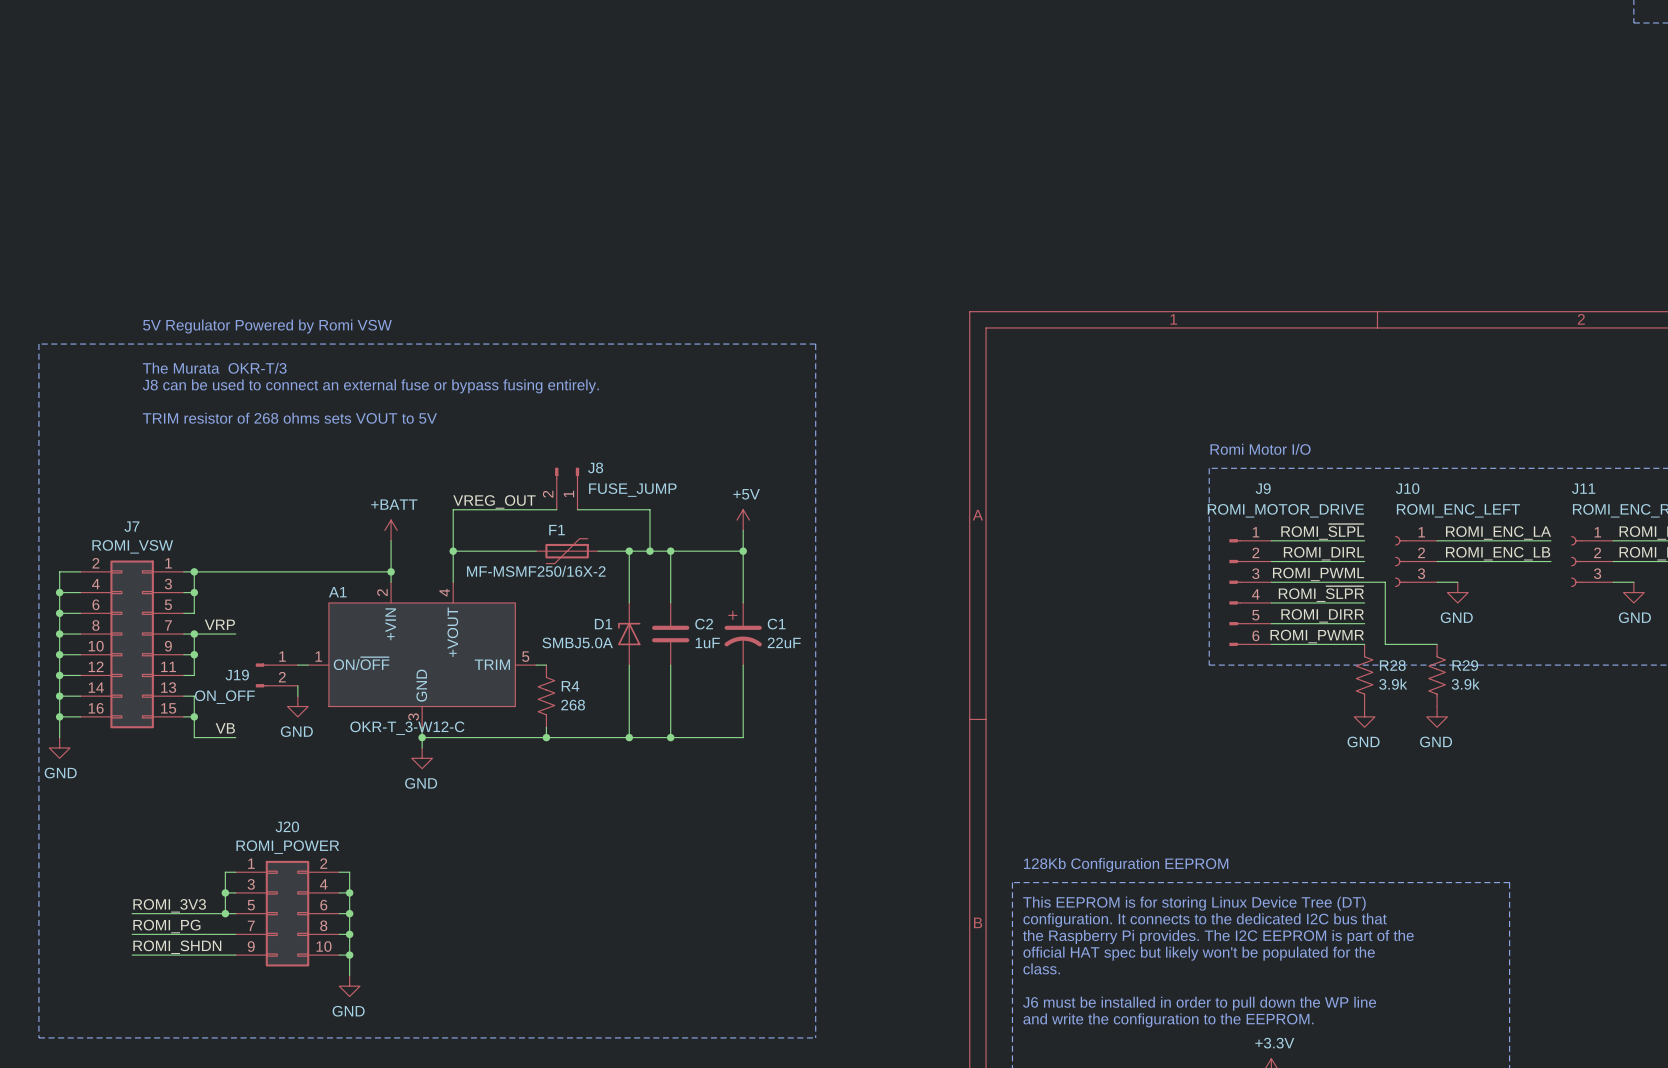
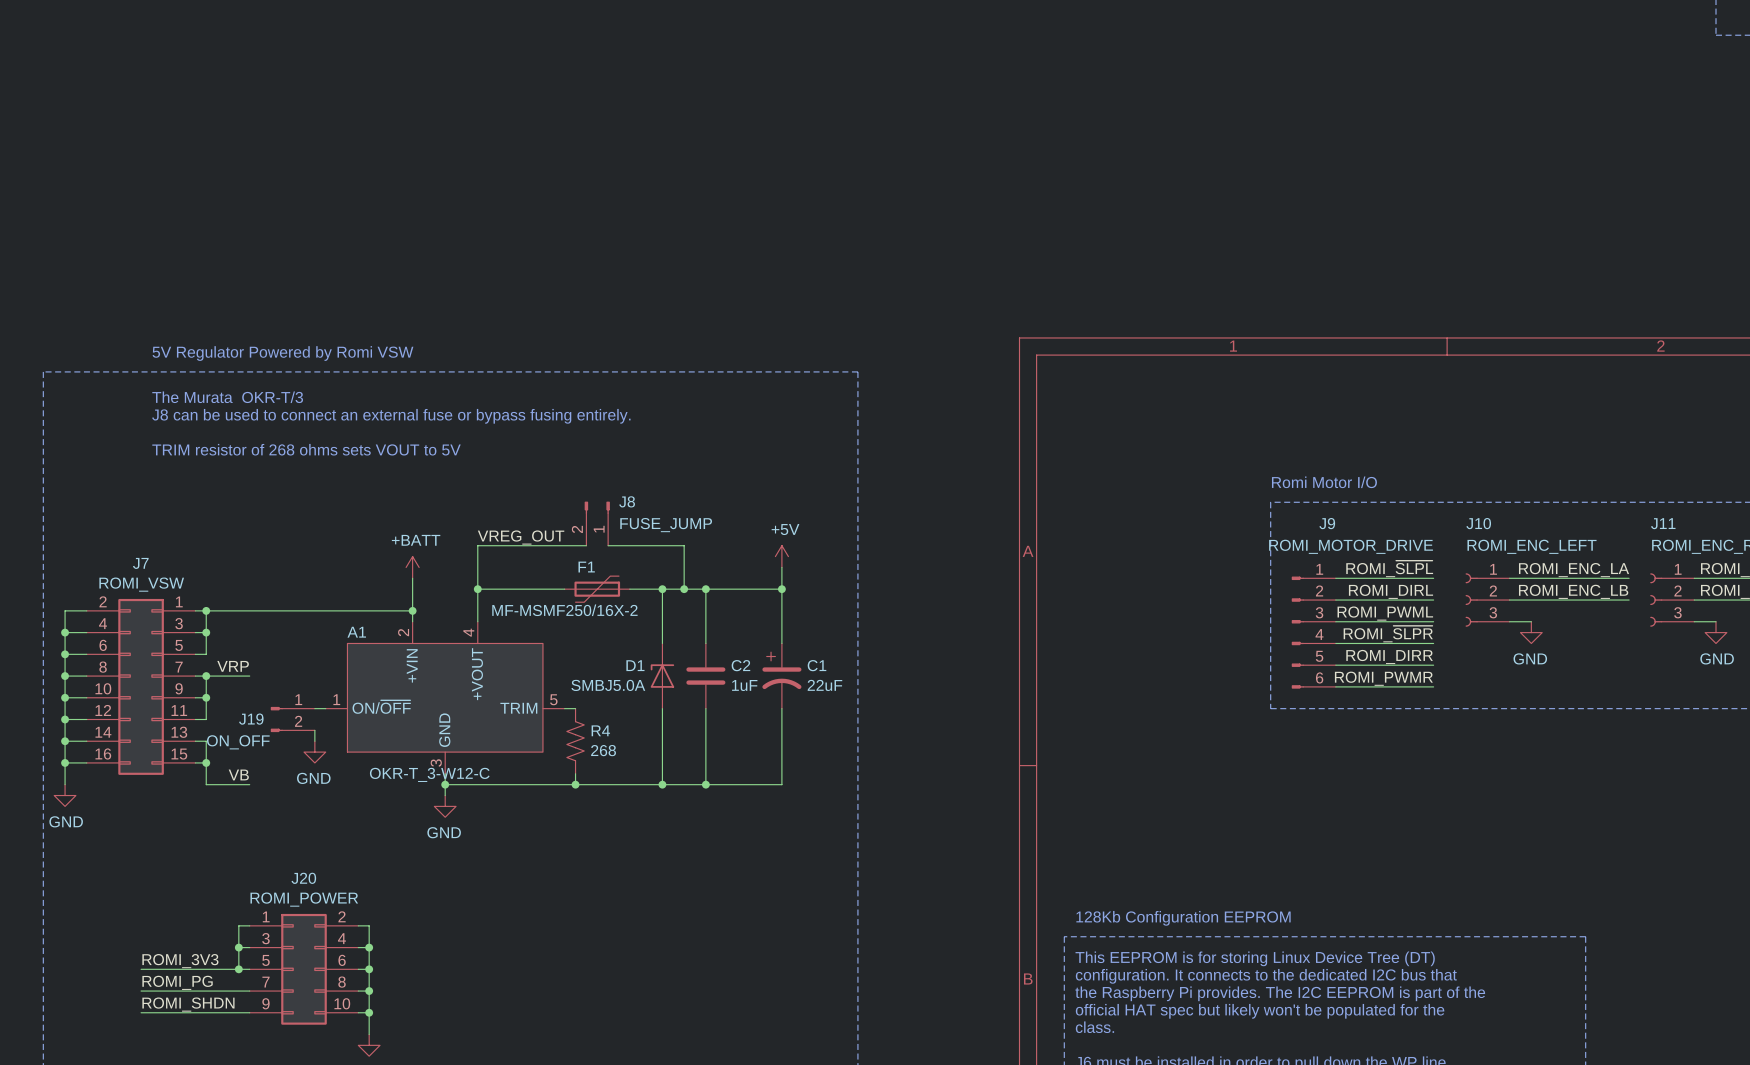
wire: (1364, 582) (1385, 582) (1385, 644) (1437, 644) -> none
R28: 3.9k (1364, 675) -> none
R29: 3.9k (1437, 675) -> none
power symbol: GND (1364, 716) -> none
power symbol: GND (1437, 716) -> none

